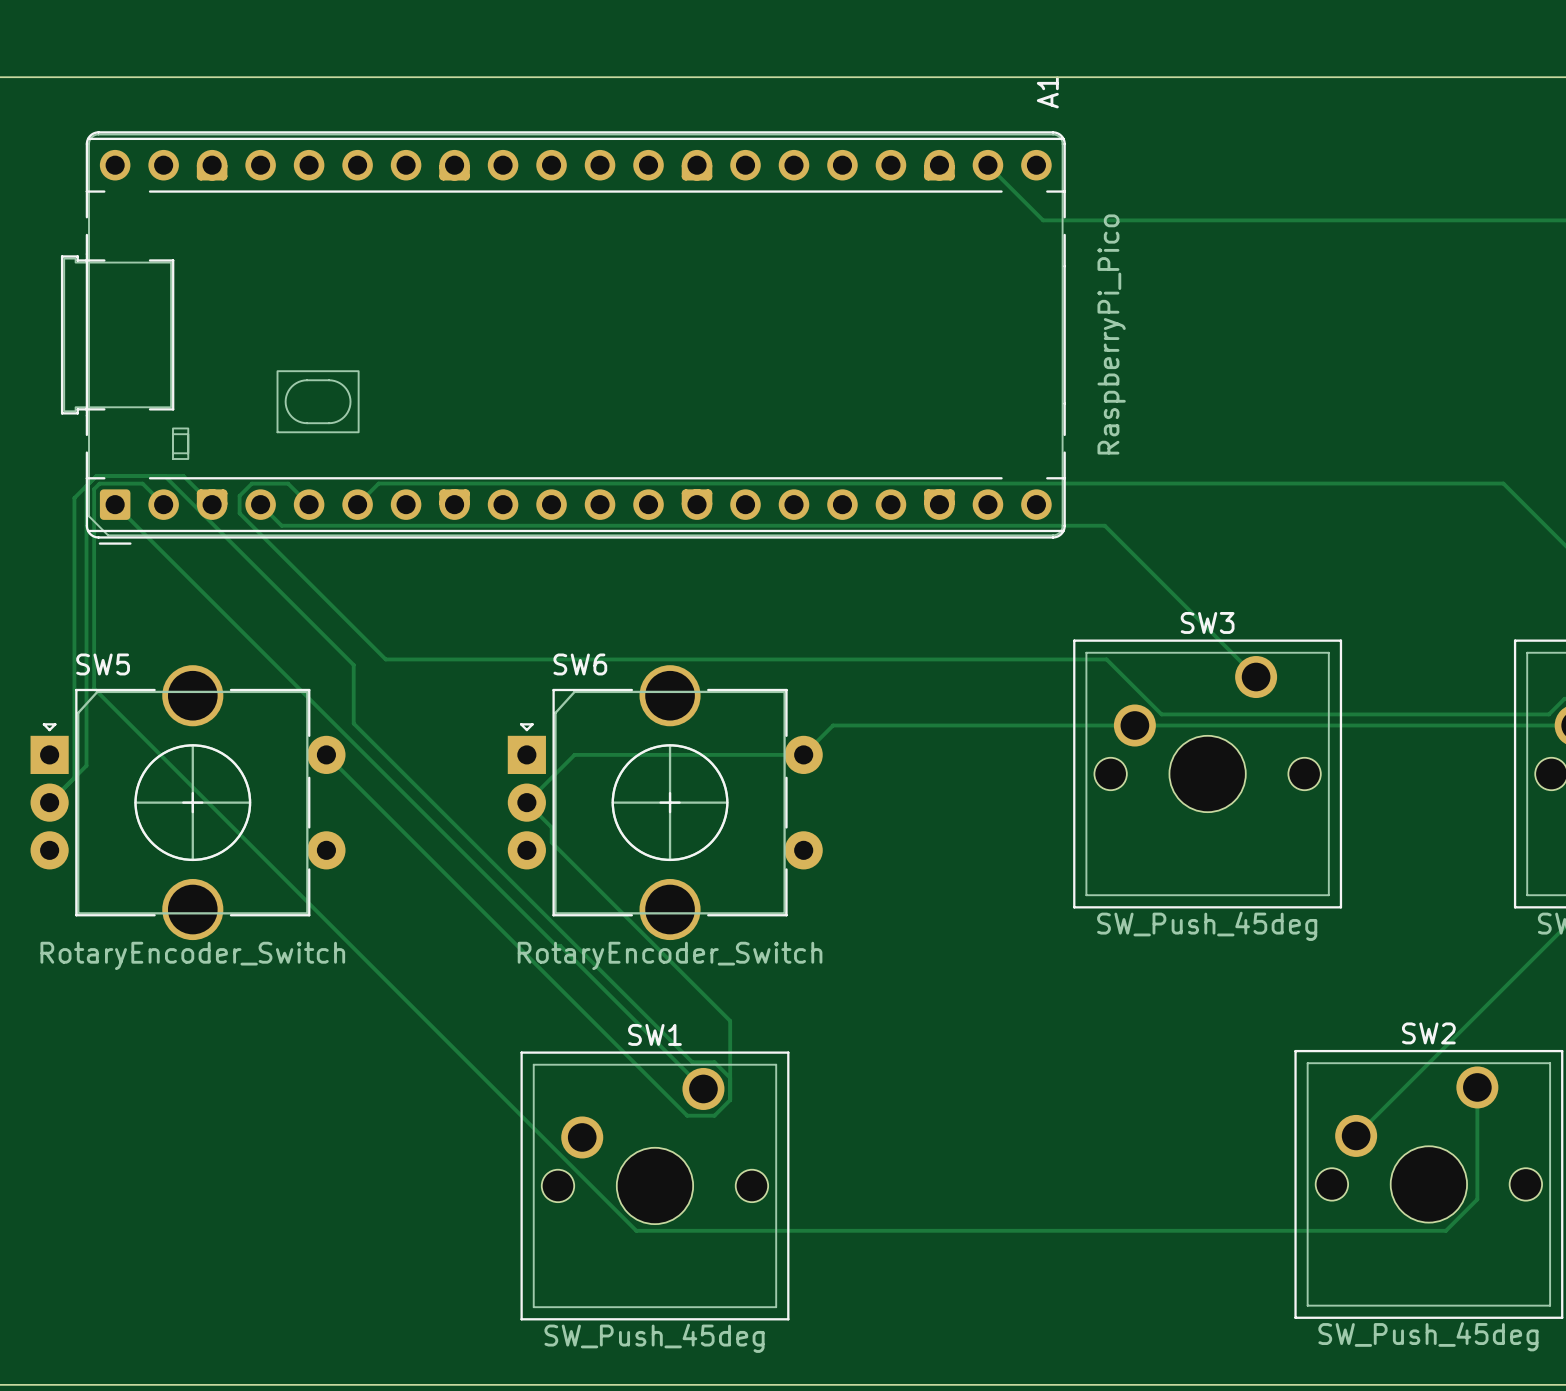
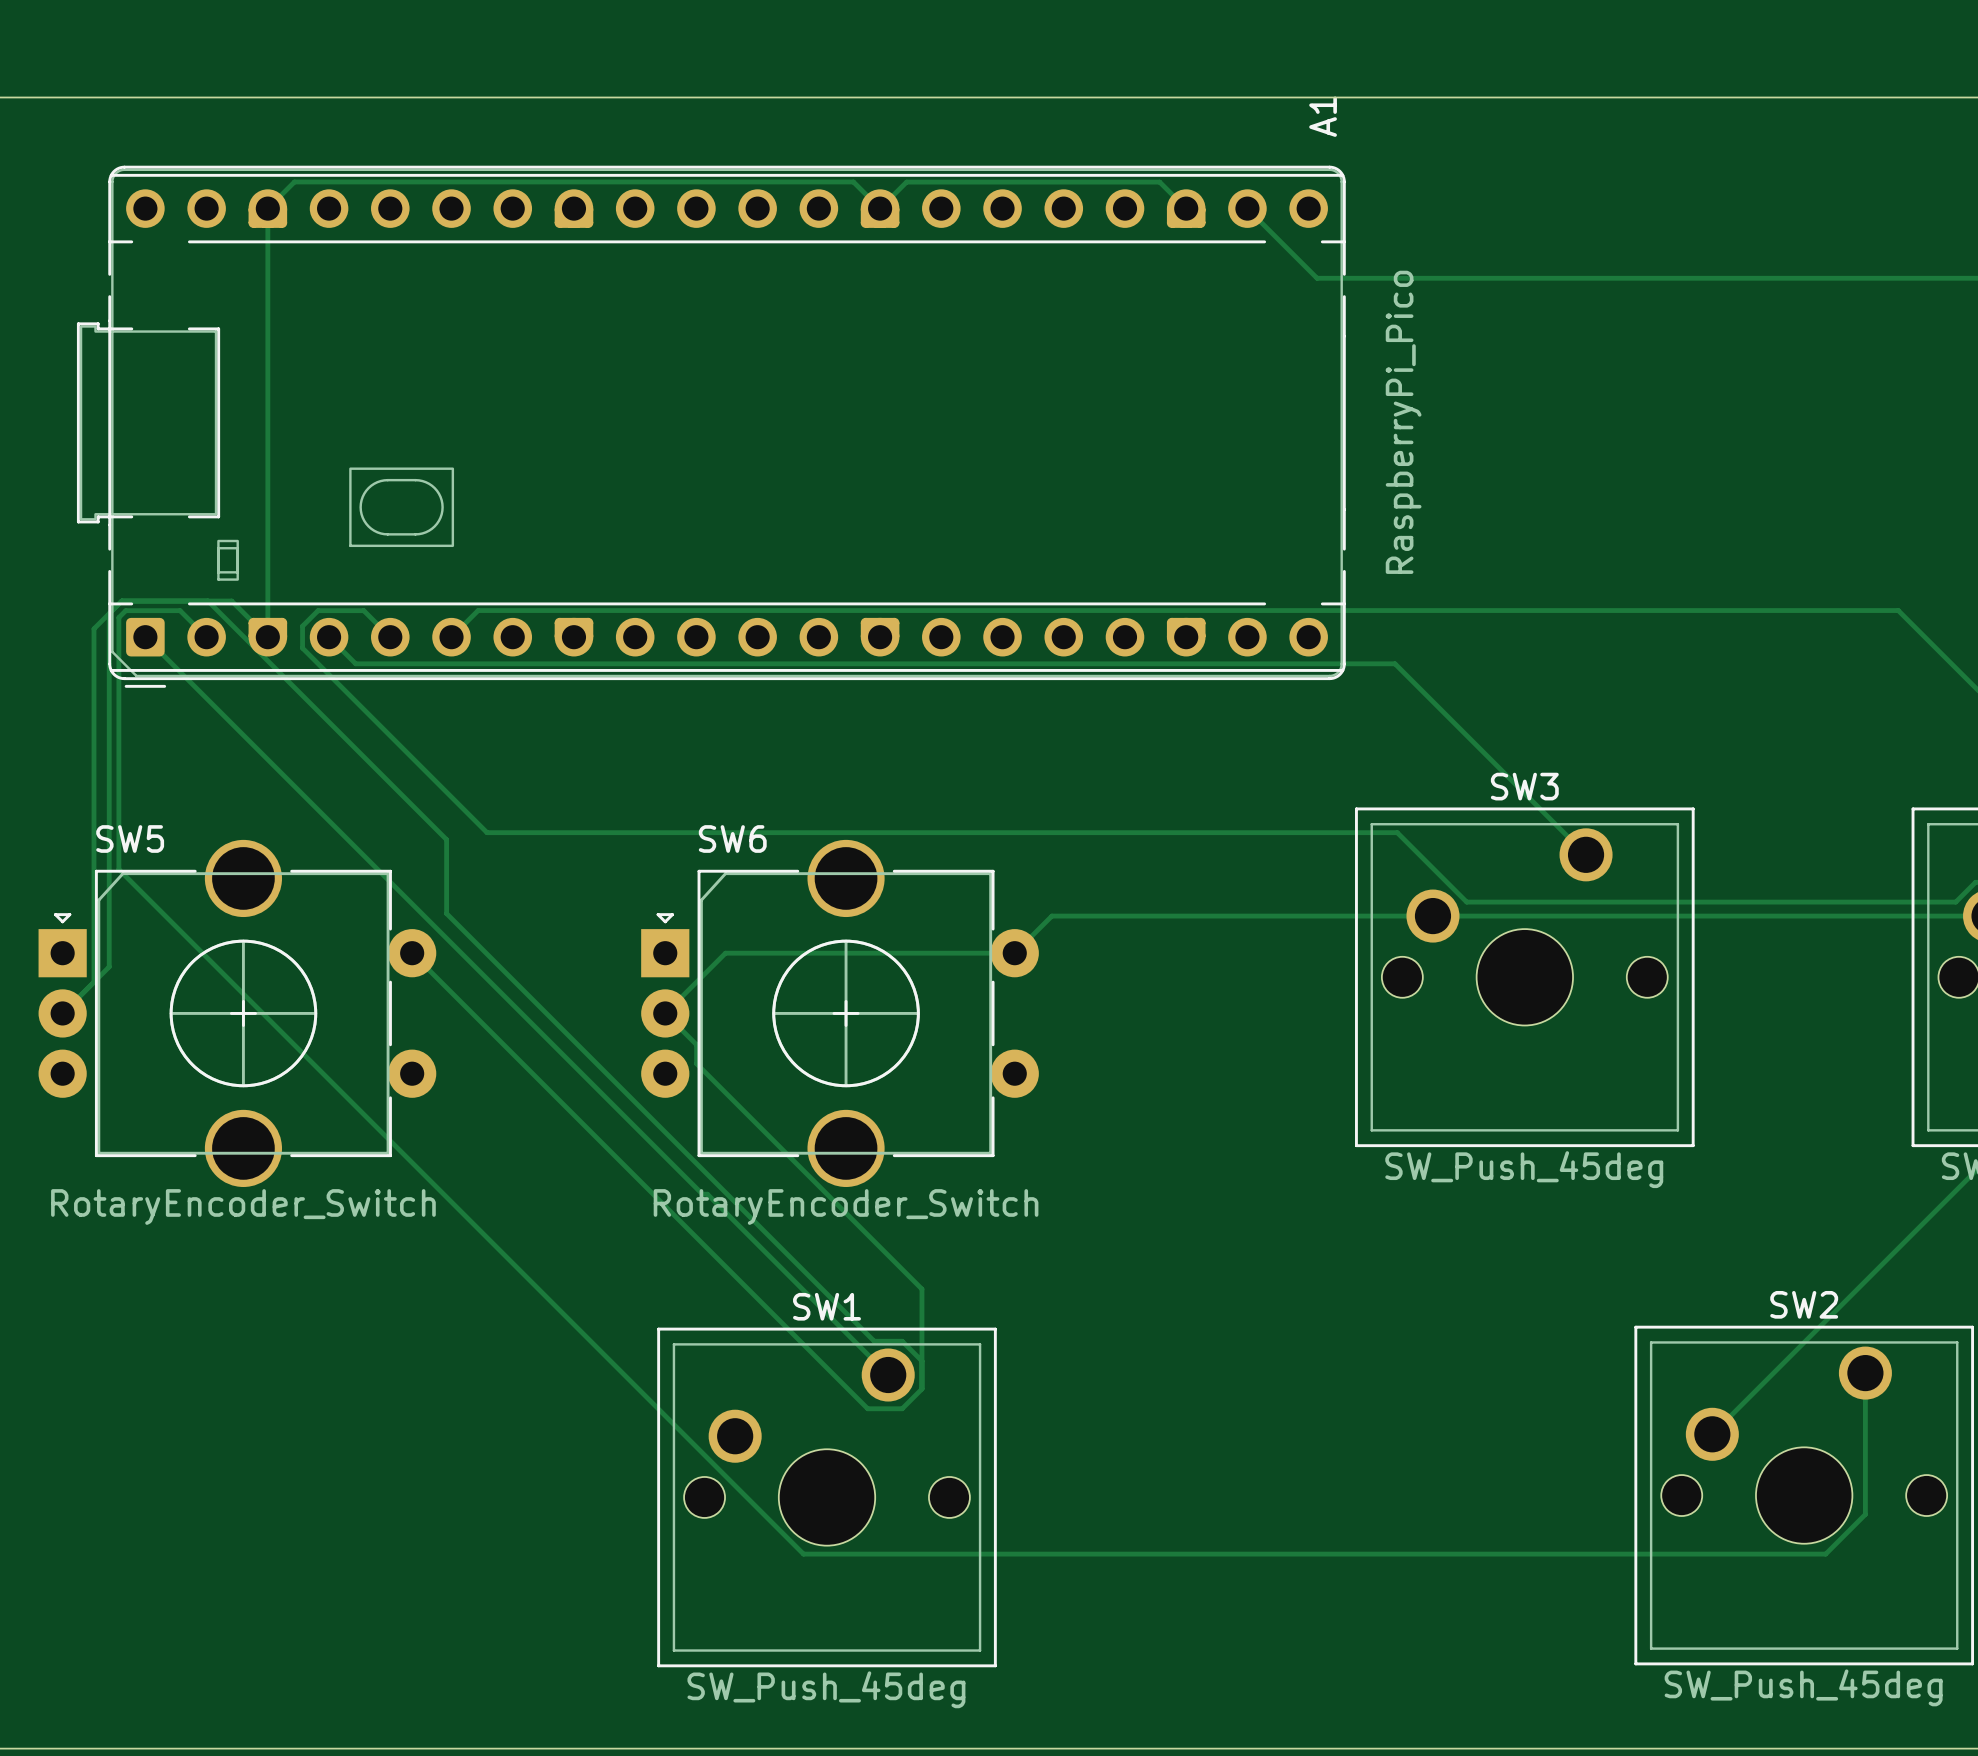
track: none -> (1186, 208) (1159, 182) (906, 182) (880, 208) (853, 181) (294, 181) (267, 208) (267, 637)

